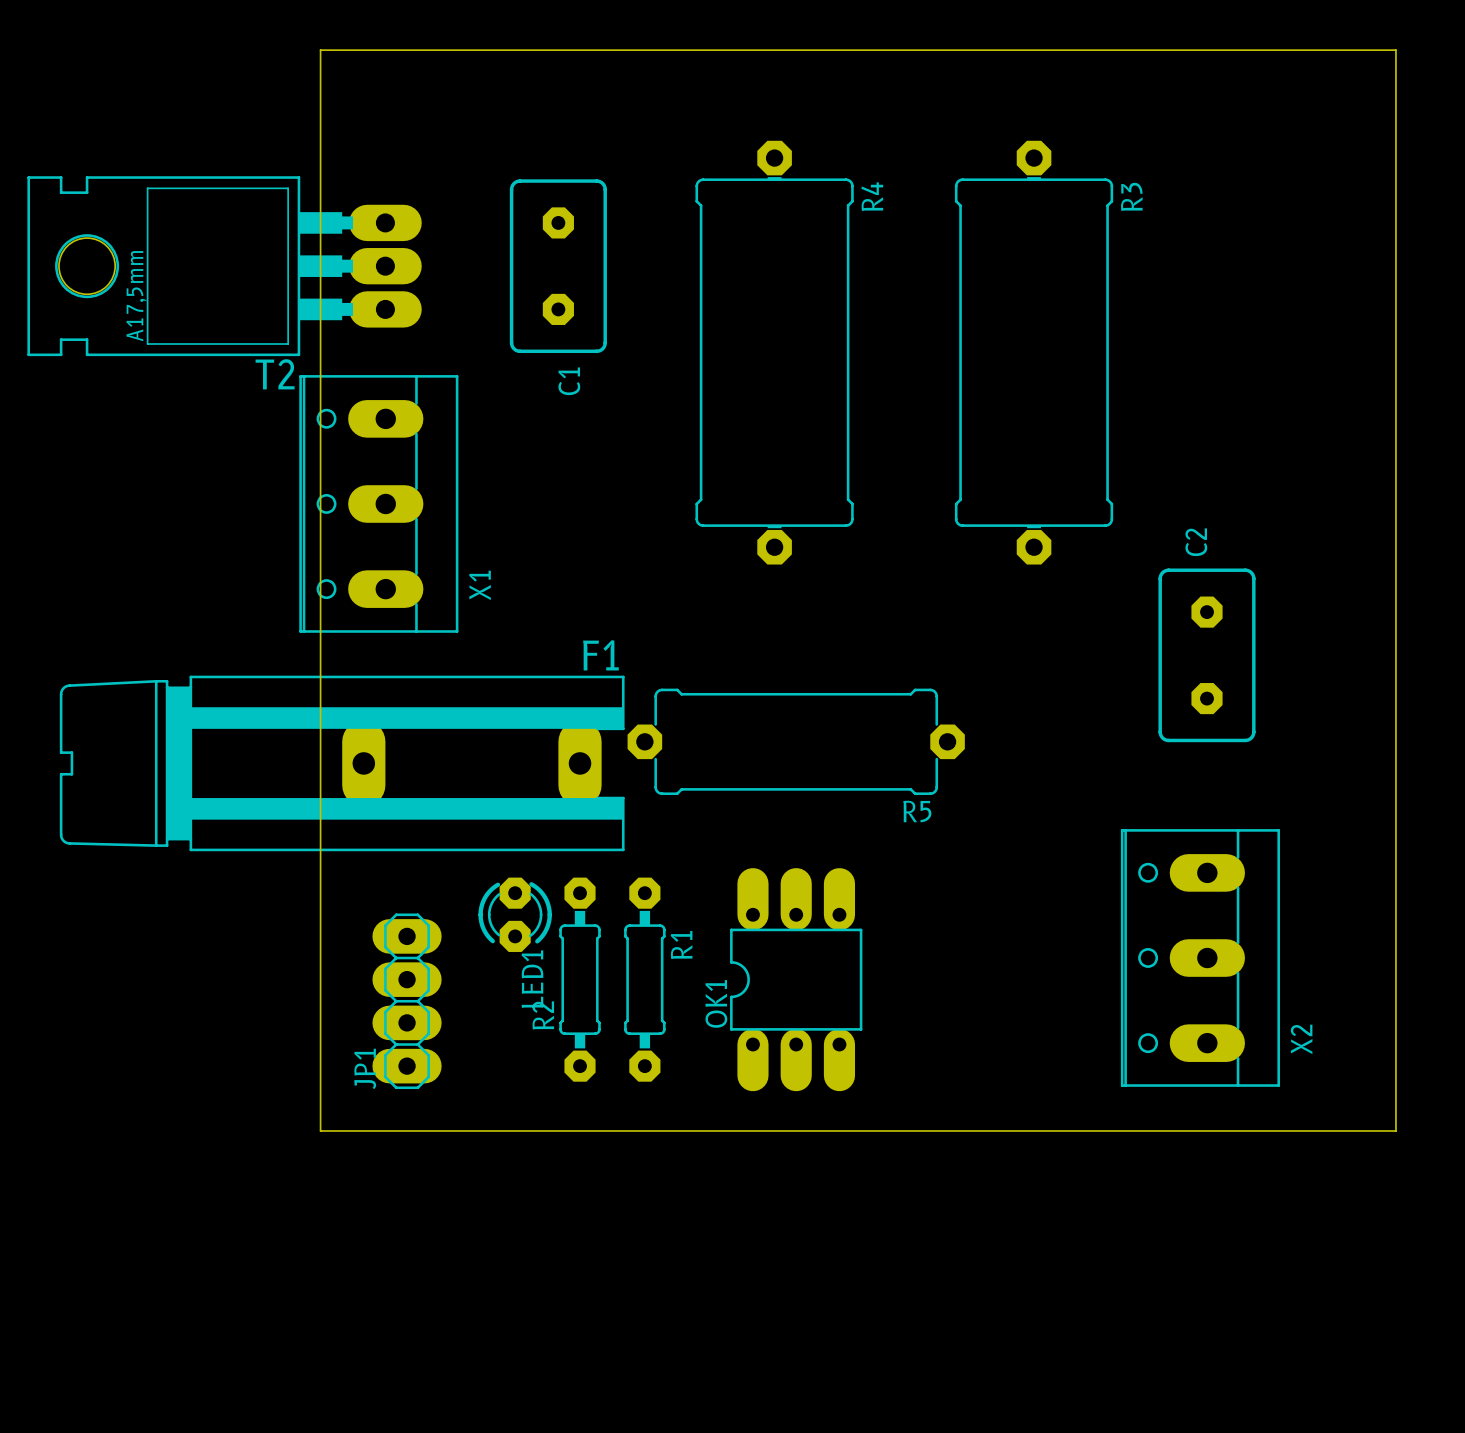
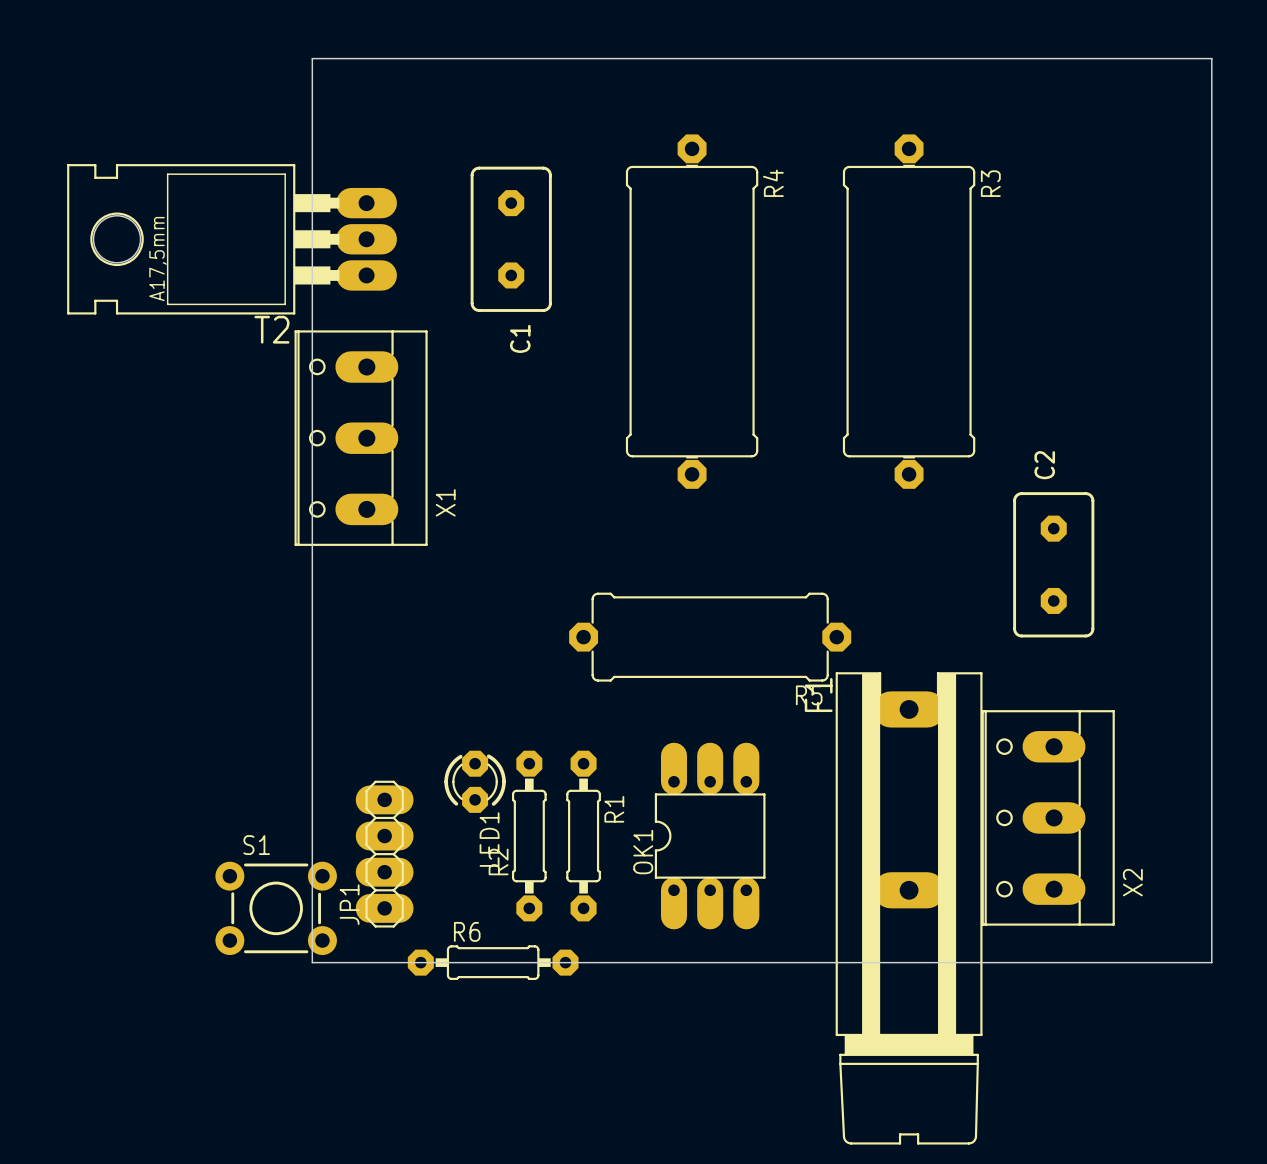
F1 rotation: 0° (342, 763) -> 90° counterclockwise (909, 908)
F1 position: (342, 763) -> (909, 908)
S1: none -> (276, 908)
R6: none -> (493, 962)

